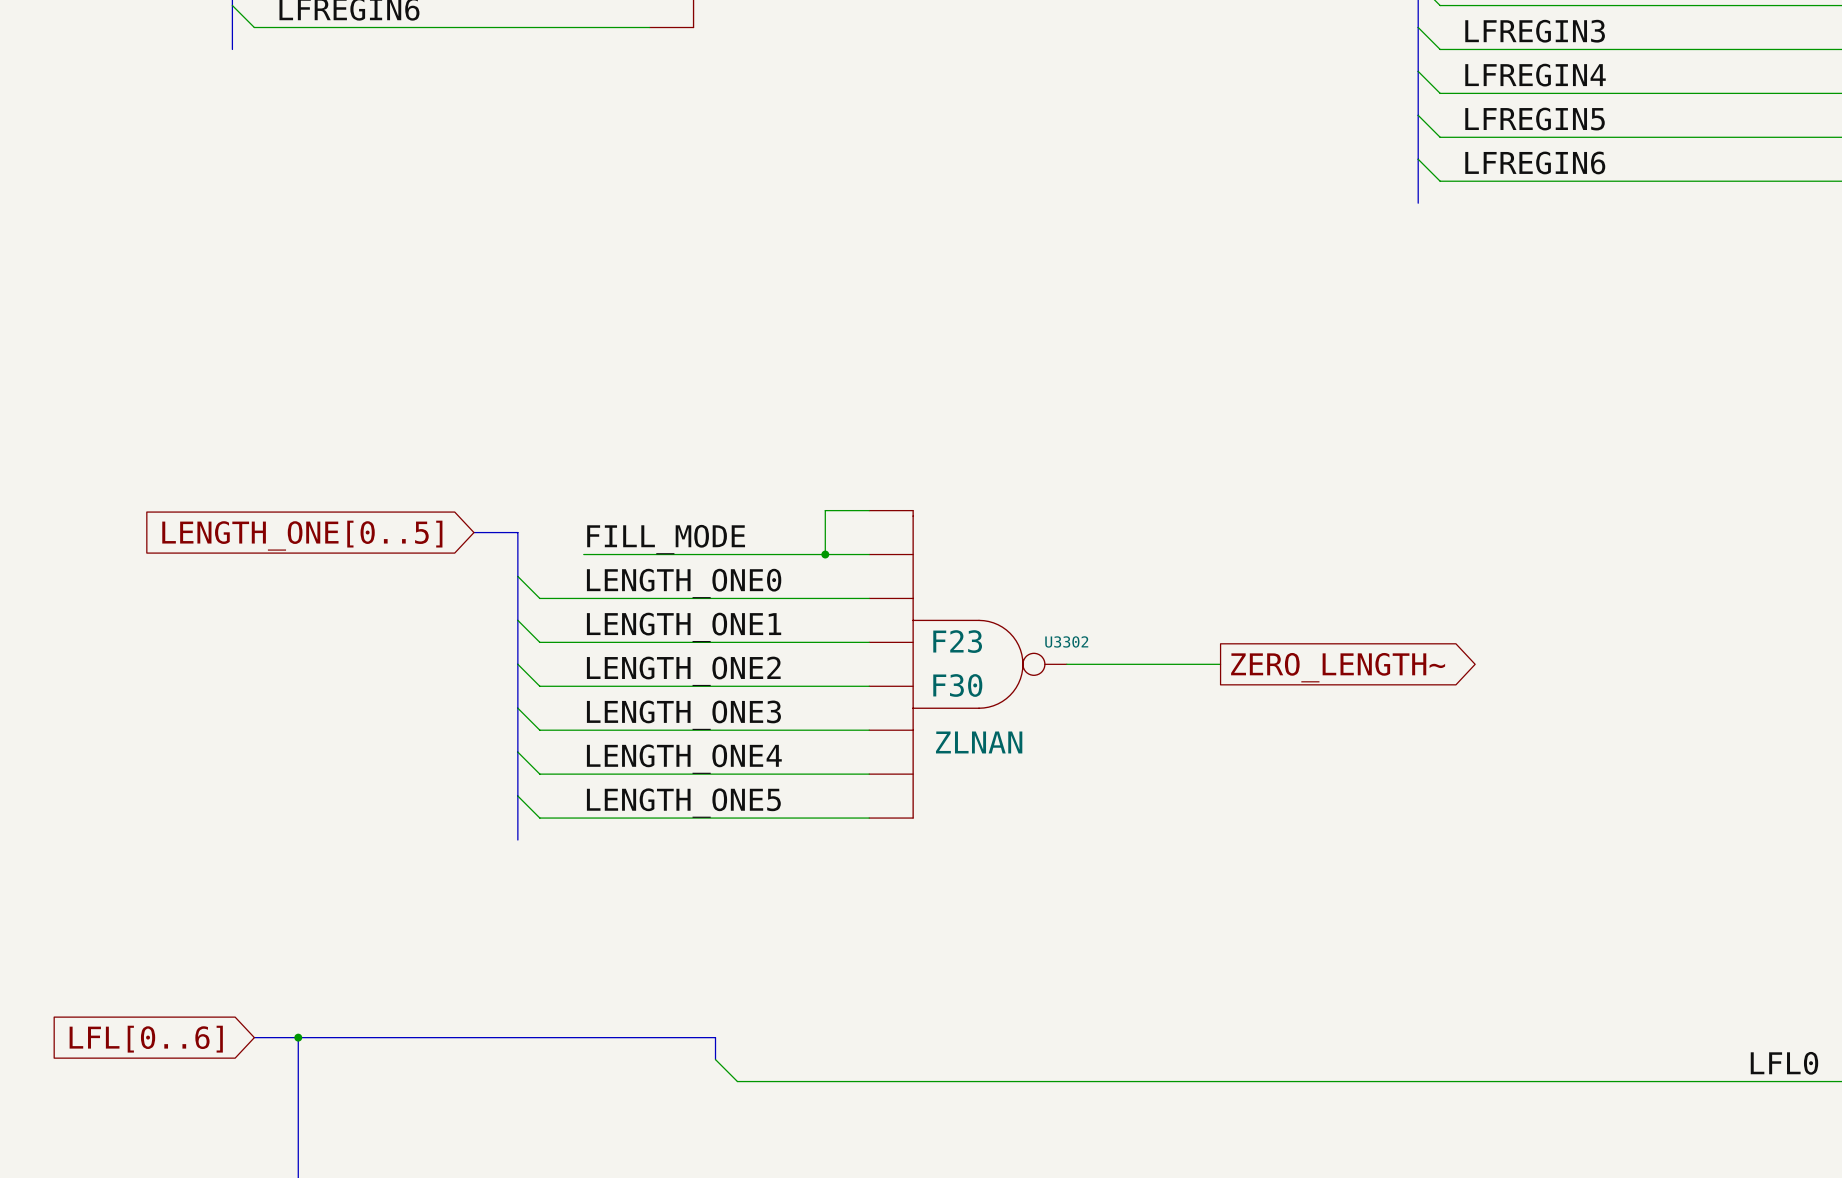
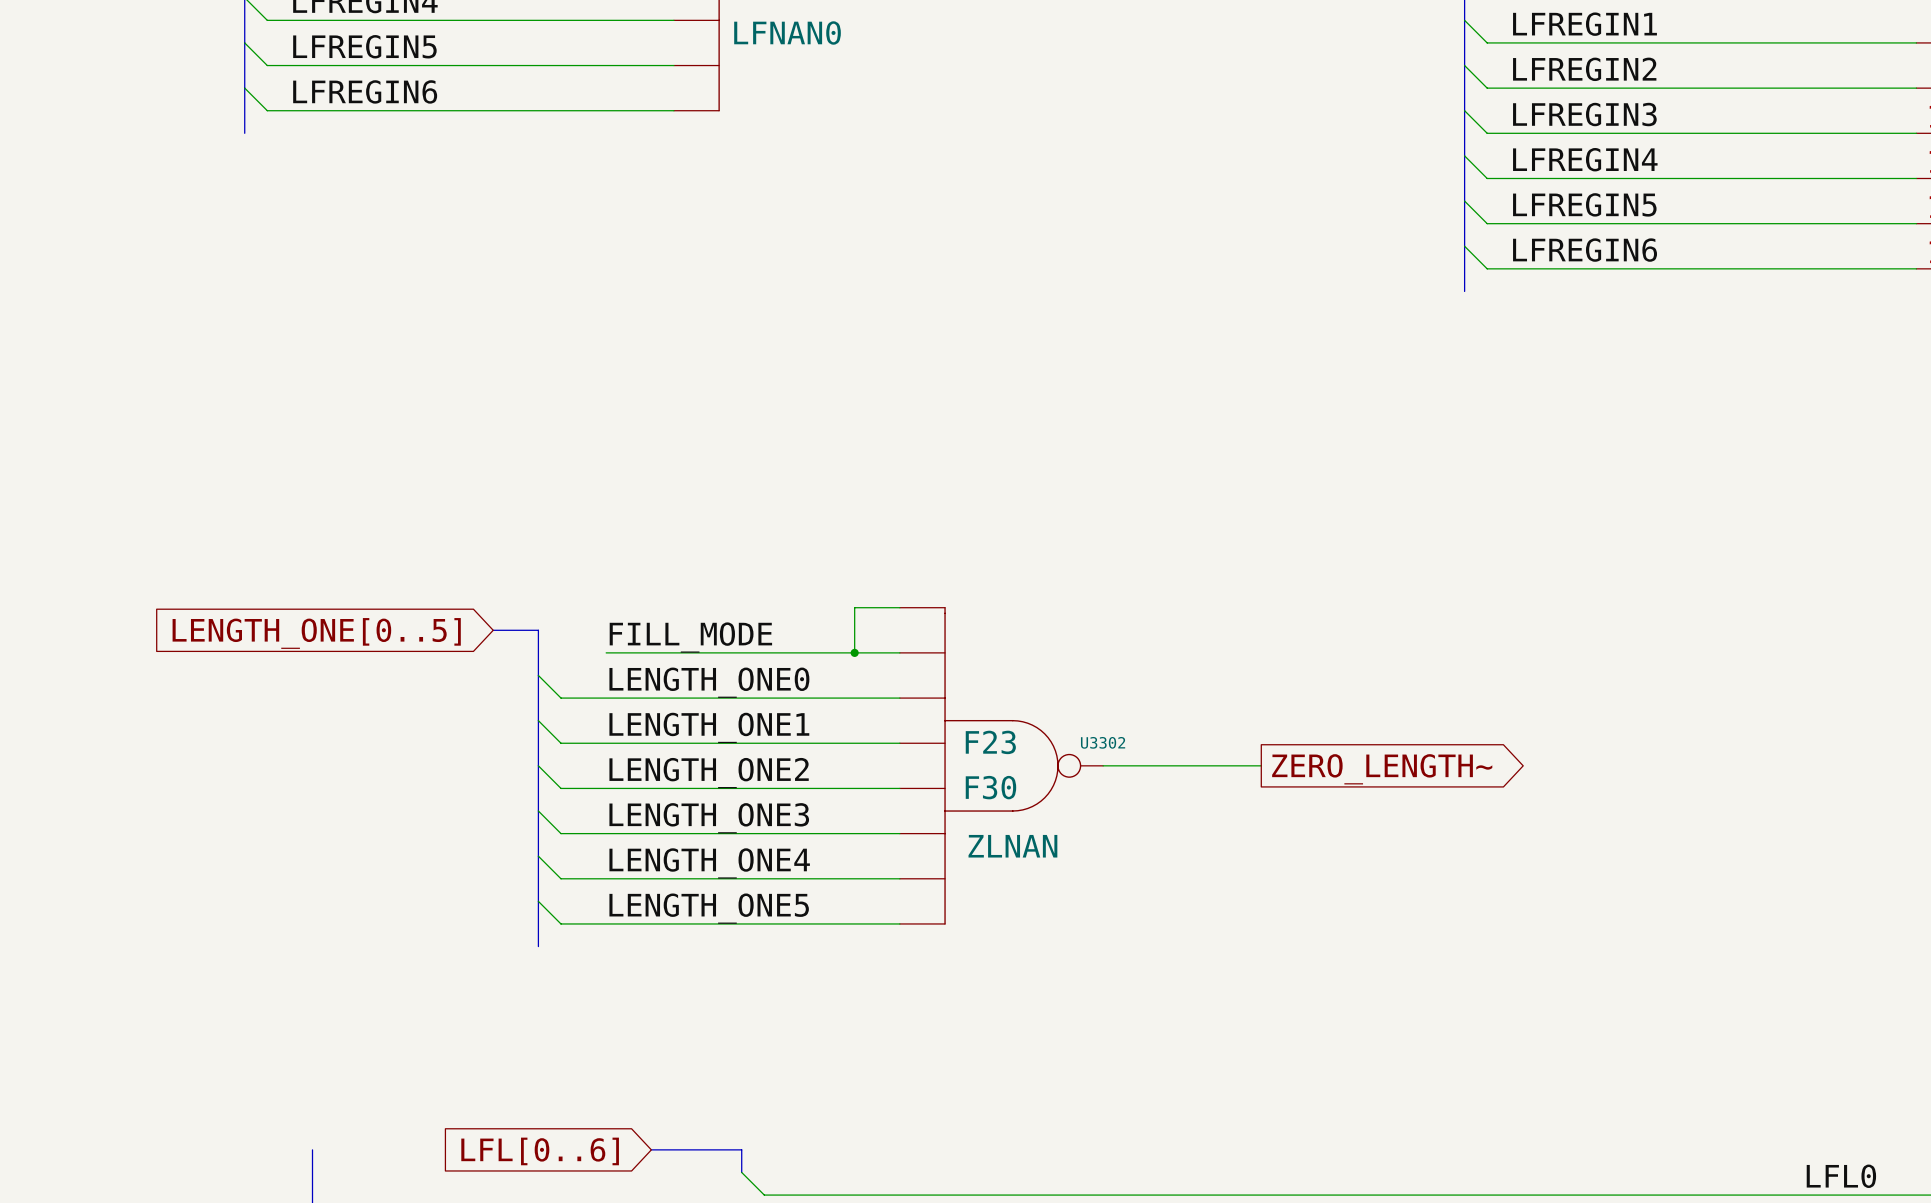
bus: (254, 1037) (627, 1037) -> none
junction: (298, 1037) -> none
global label: LFL[0..6] (146, 1039) -> none
global label: none -> LFL[0..6] (540, 1151)

